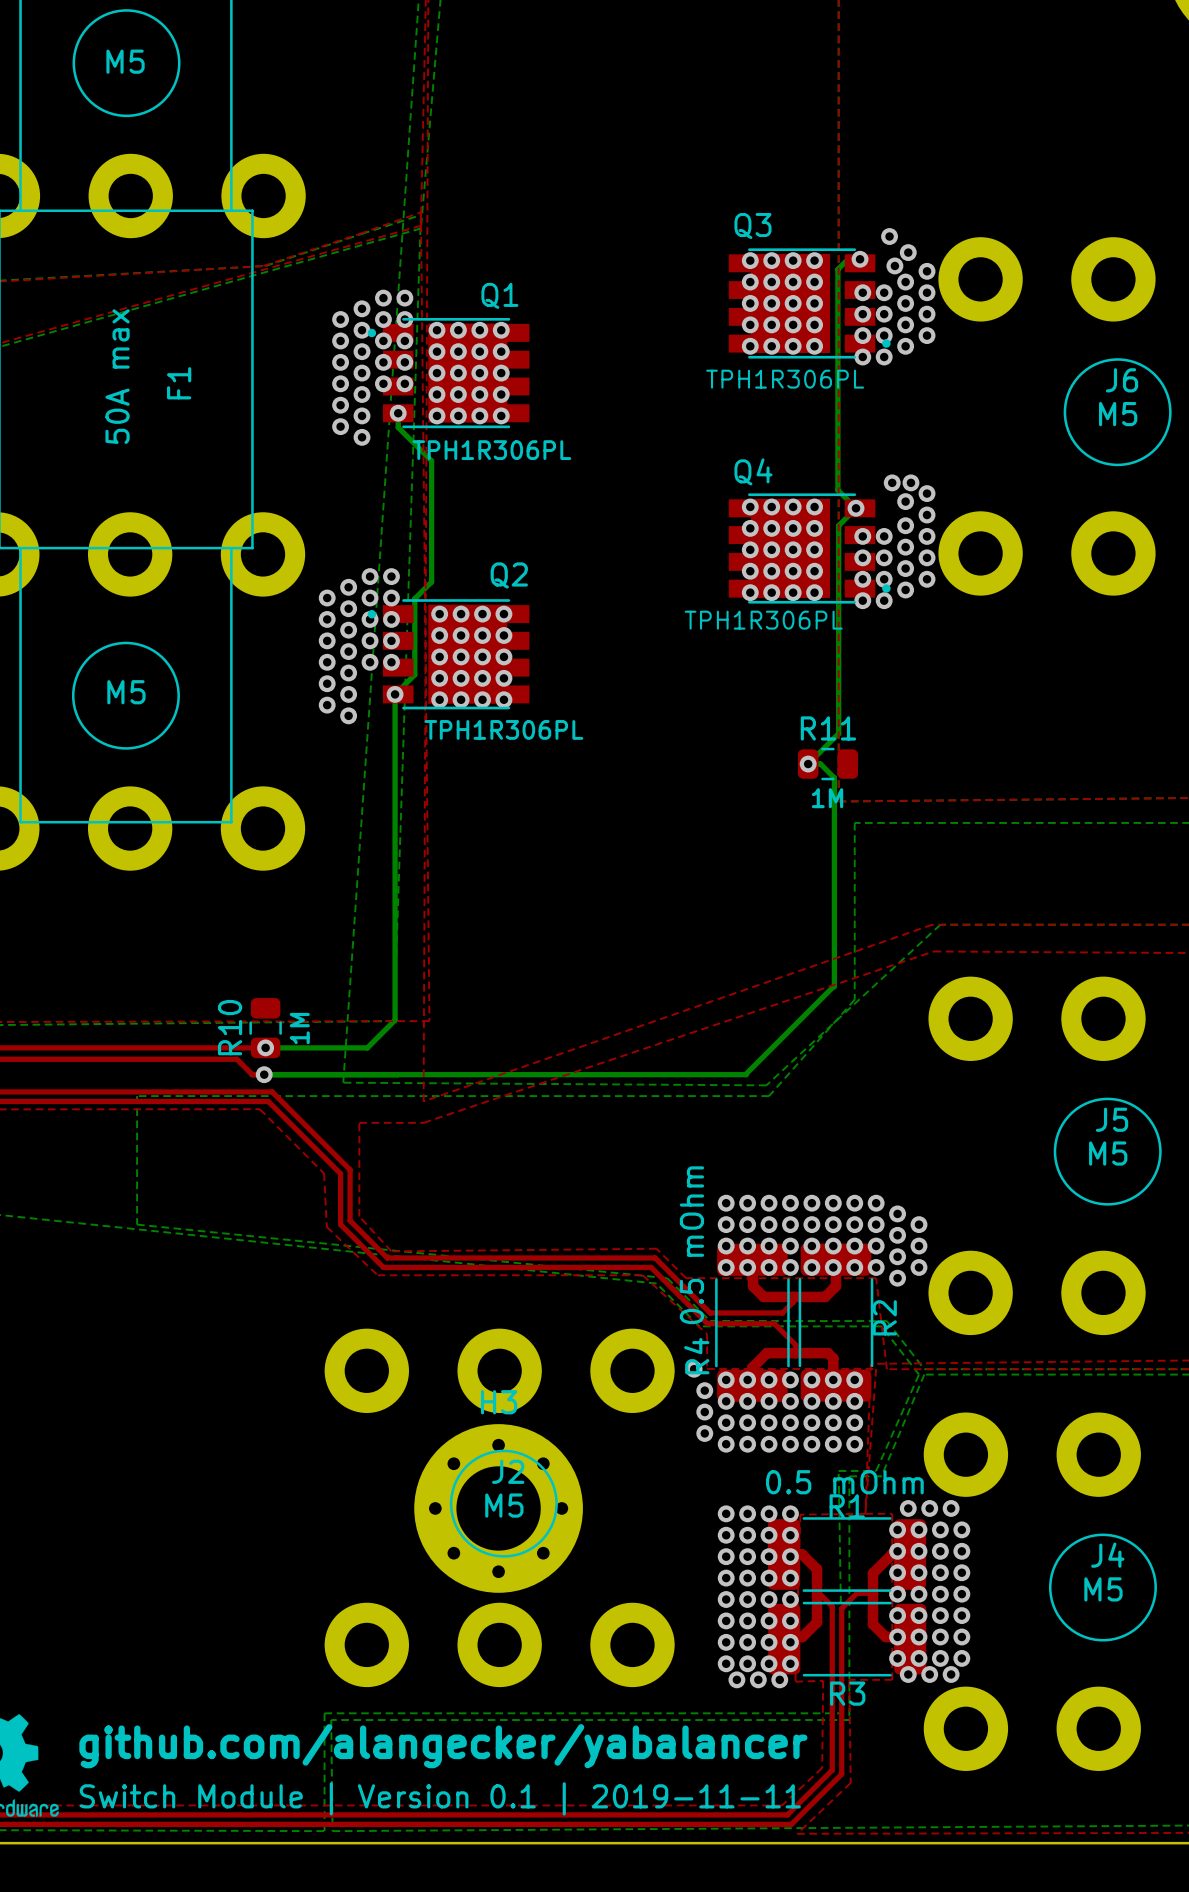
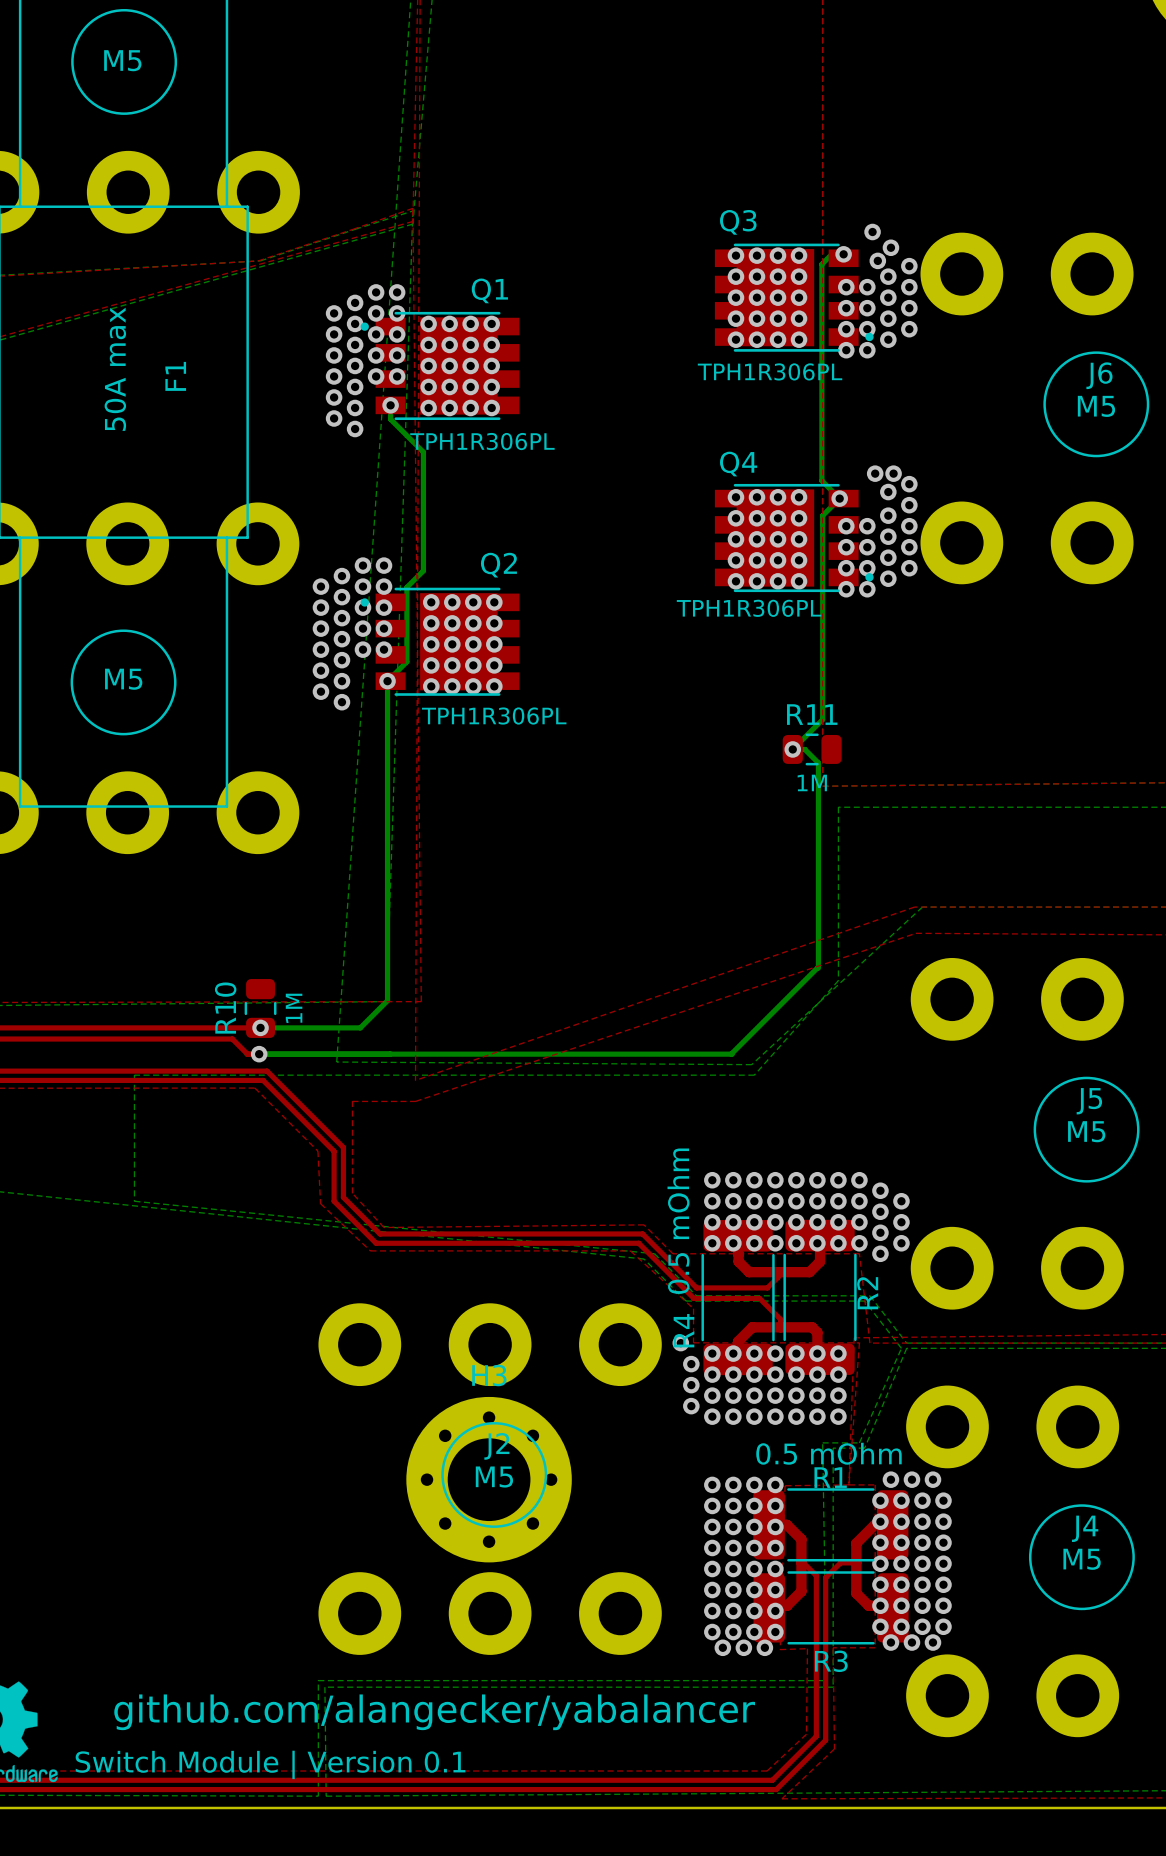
text: Switch Module | Version 0.1 | 2019-11-11 (440, 1798) -> Switch Module | Version 0.1 (270, 1764)

